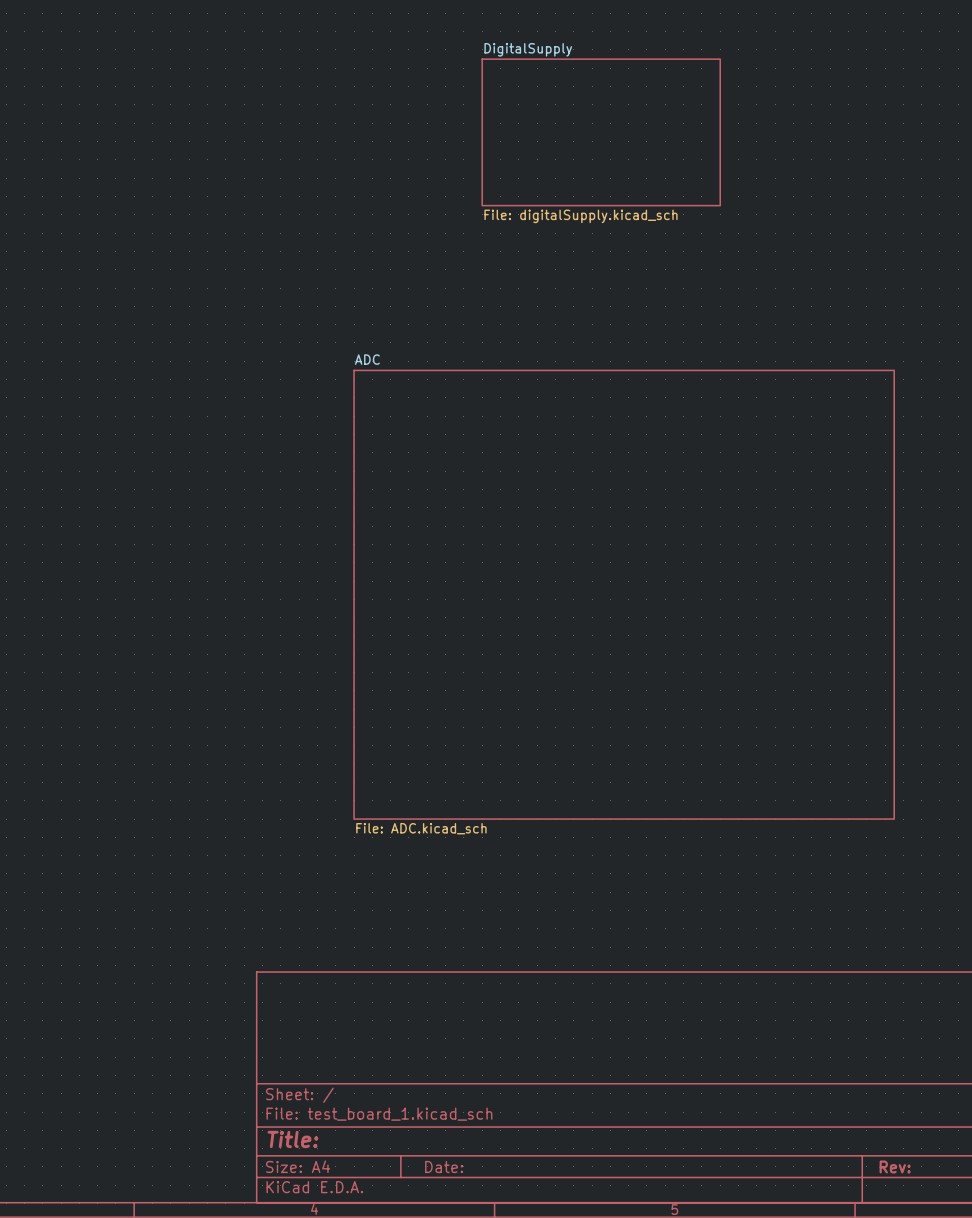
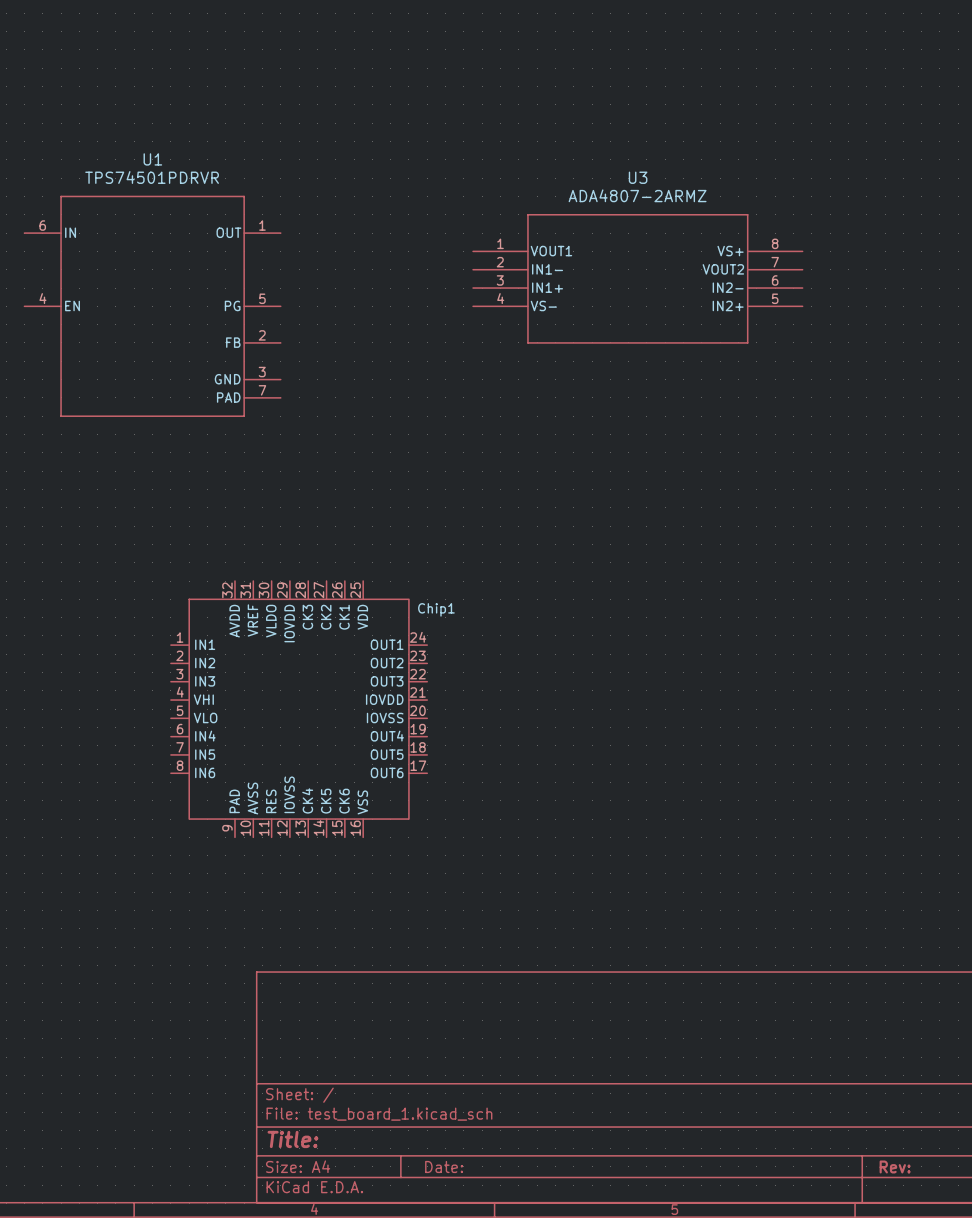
sheet DigitalSupply: File: digitalSupply.kicad_sch (601, 132) -> none
U3: none -> ADA4807-2ARMZ (637, 278)
U1: none -> TPS74501PDRVR (152, 306)
sheet ADC: File: ADC.kicad_sch (624, 594) -> none
Chip1: none -> (299, 709)

